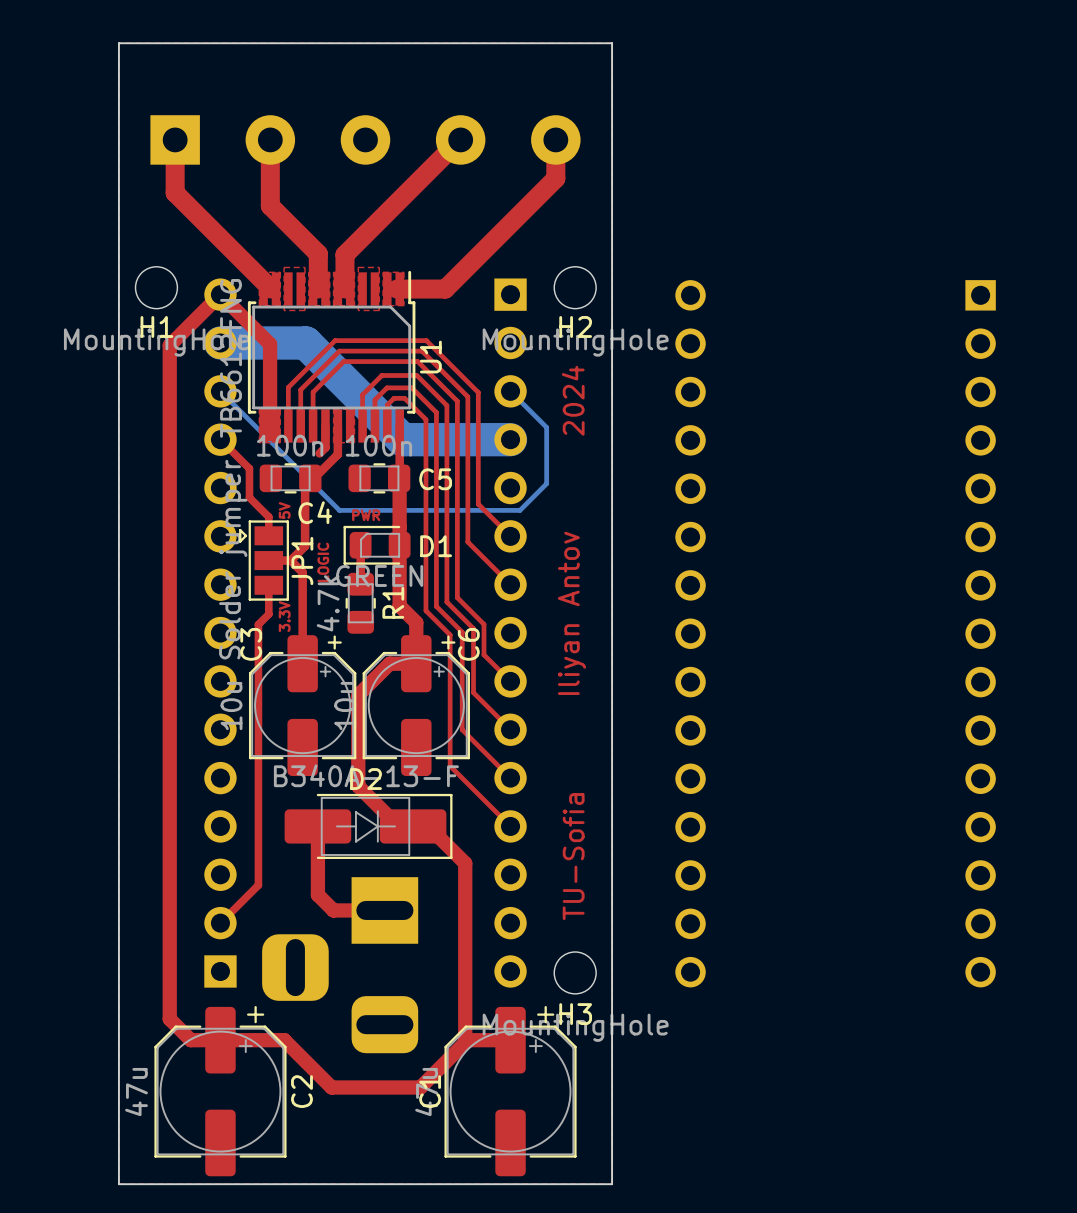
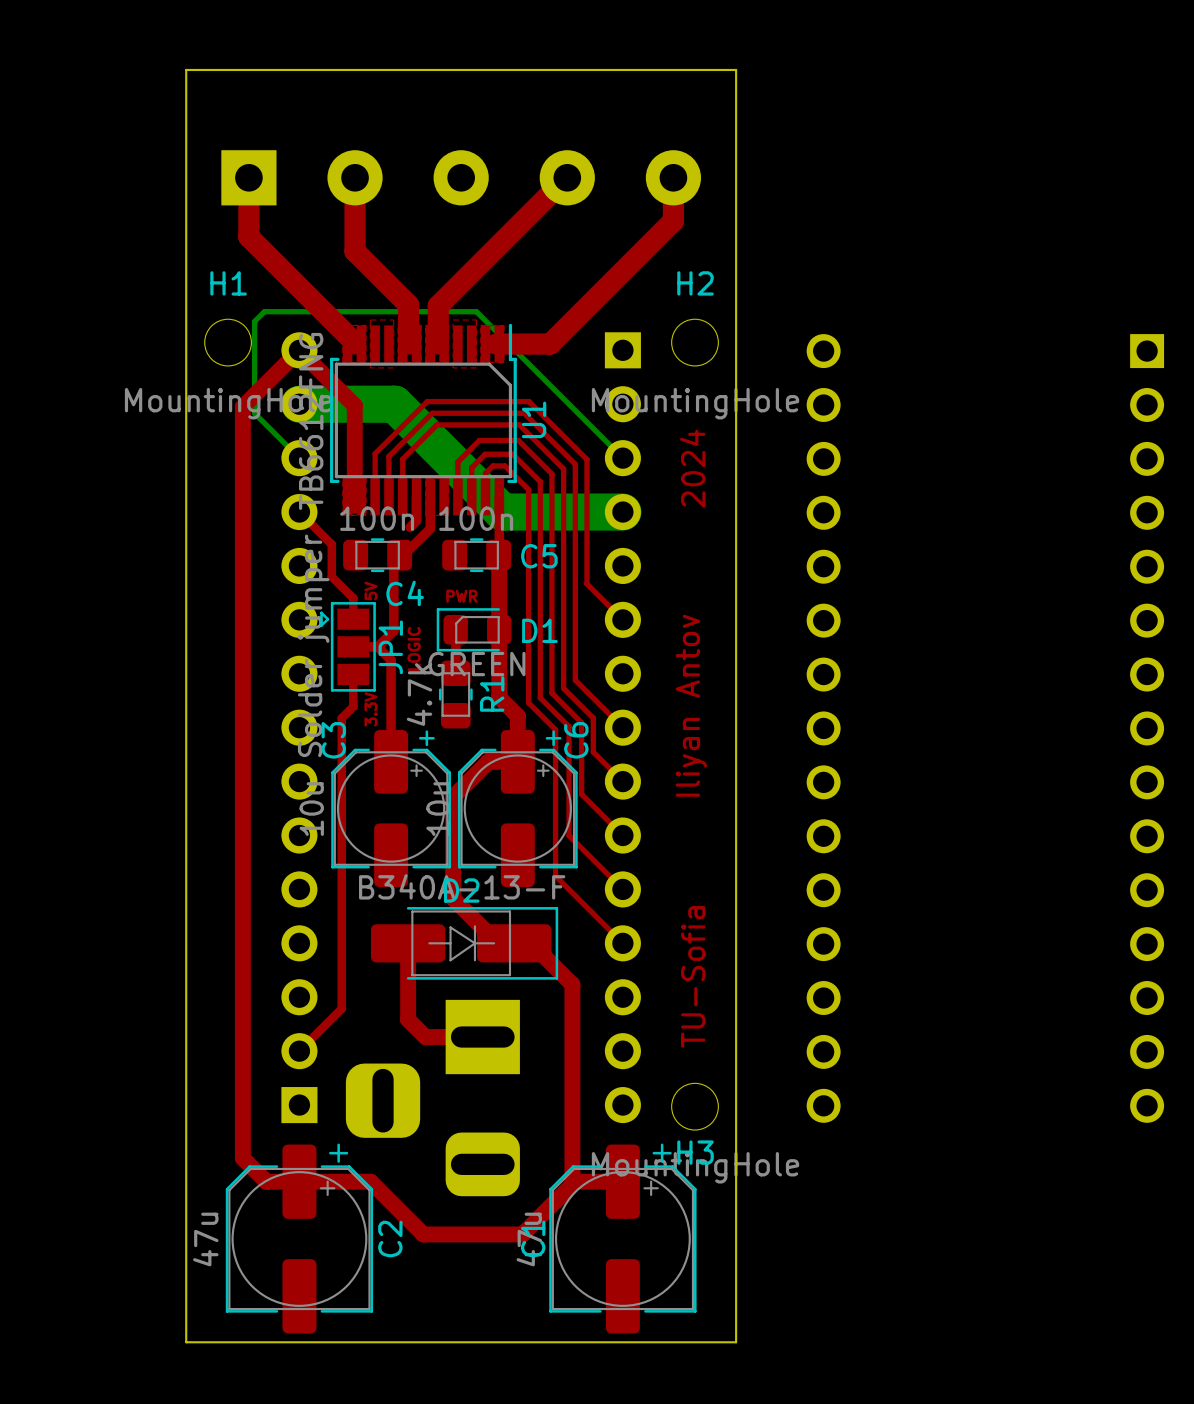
H1 name position: H1 (156, 326) -> H1 (228, 283)
H2 name position: H2 (575, 326) -> H2 (695, 283)
bottom track: (220, 391) (339, 510) (520, 510) (546, 483) (546, 427) (510, 391) -> (299, 458) (254, 413) (254, 321) (264, 311) (476, 311) (622, 458)
top track: (467, 542) (510, 584) -> (575, 626) (575, 680) (622, 727)

